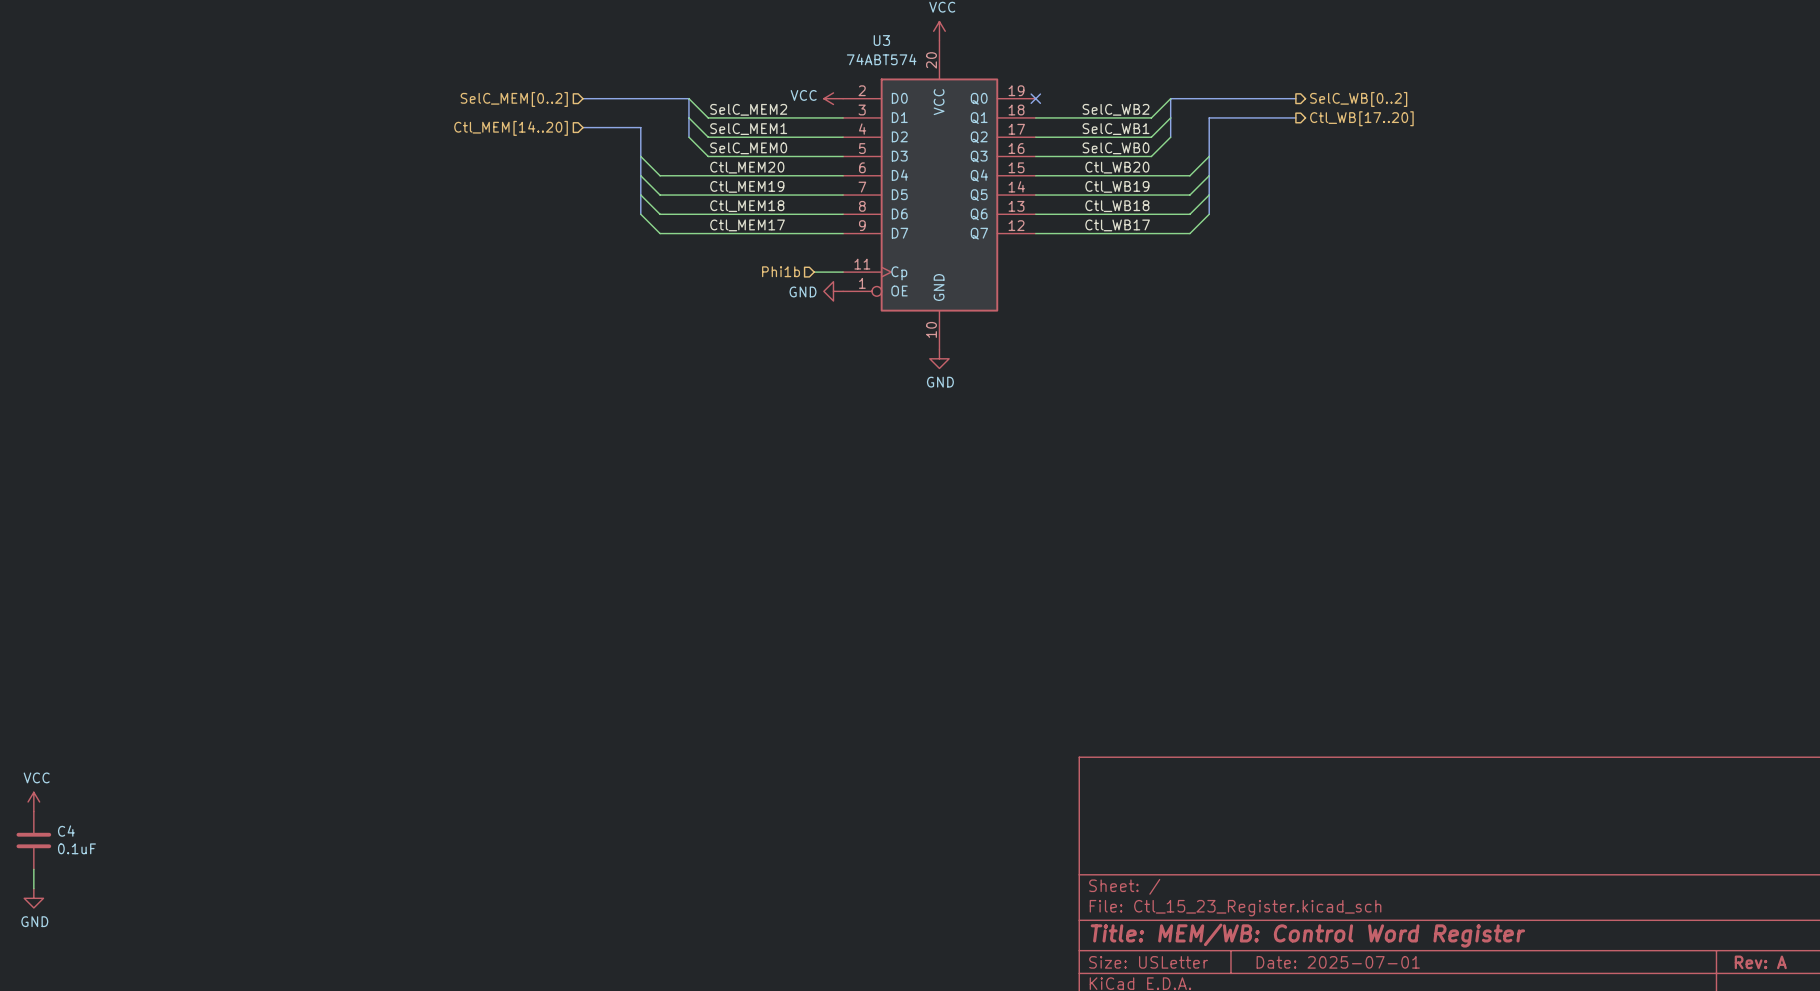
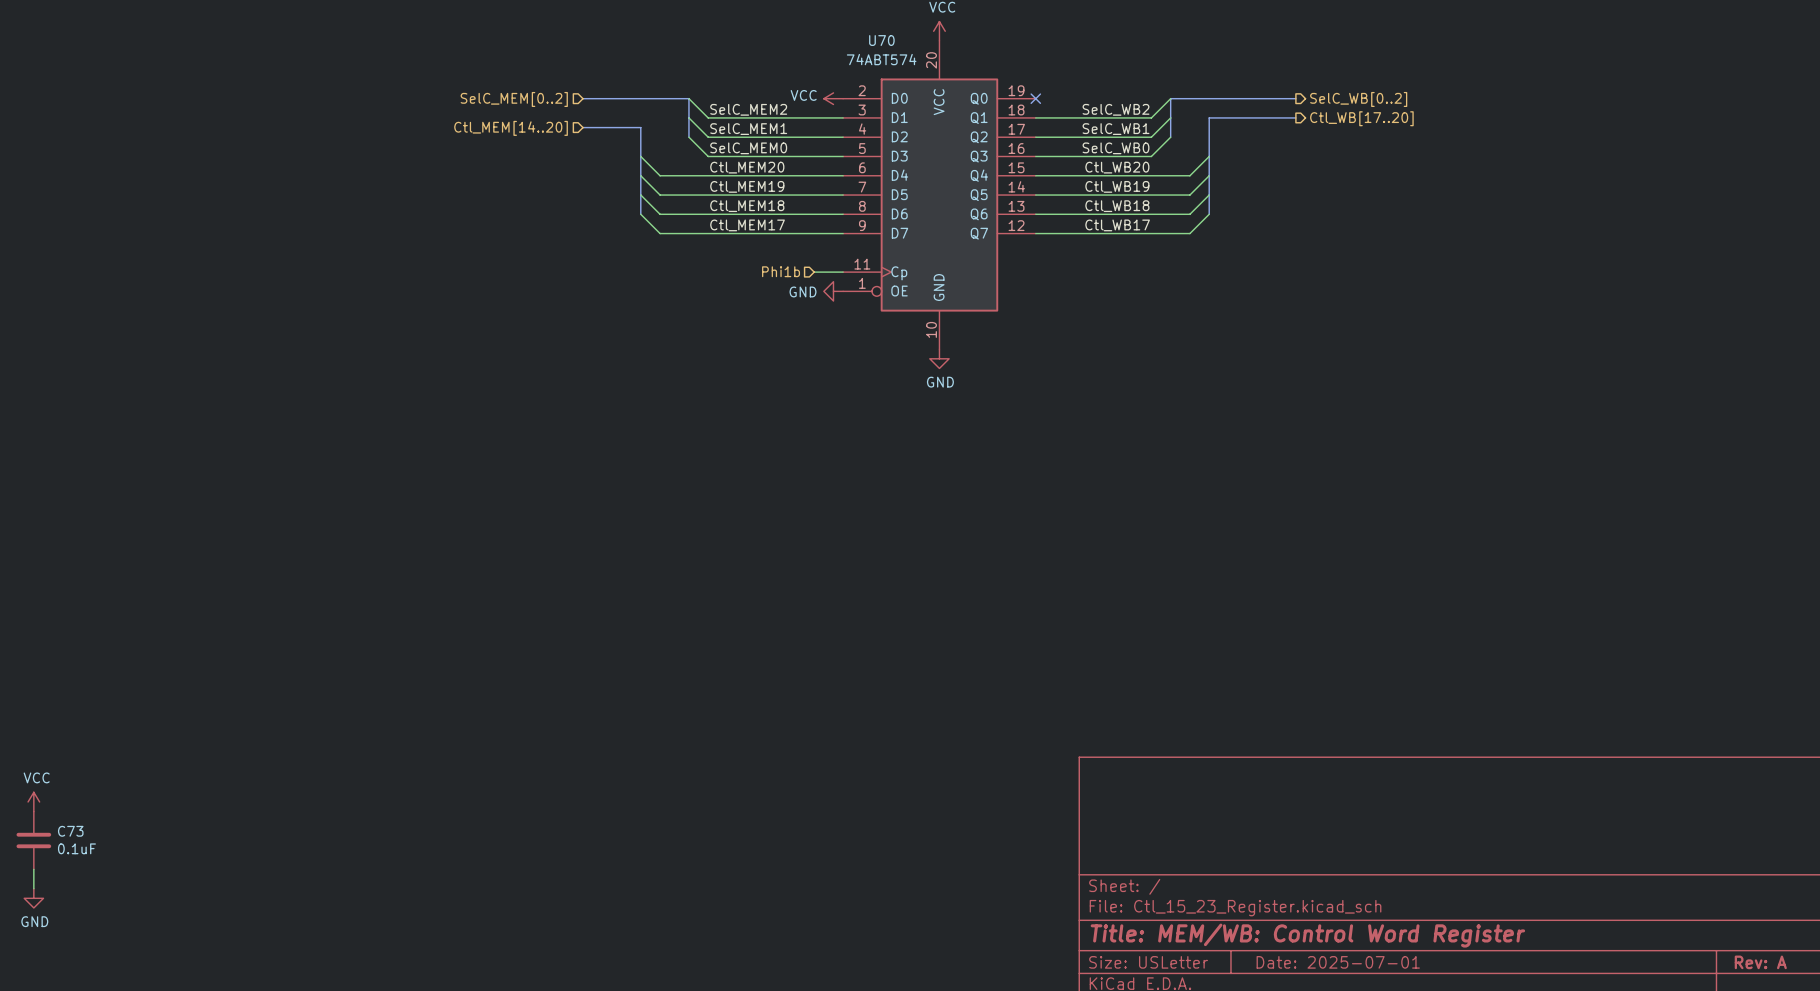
U3 name: U3 (881, 40) -> U70 (881, 40)
C4 name: C4 (66, 831) -> C73 (70, 831)

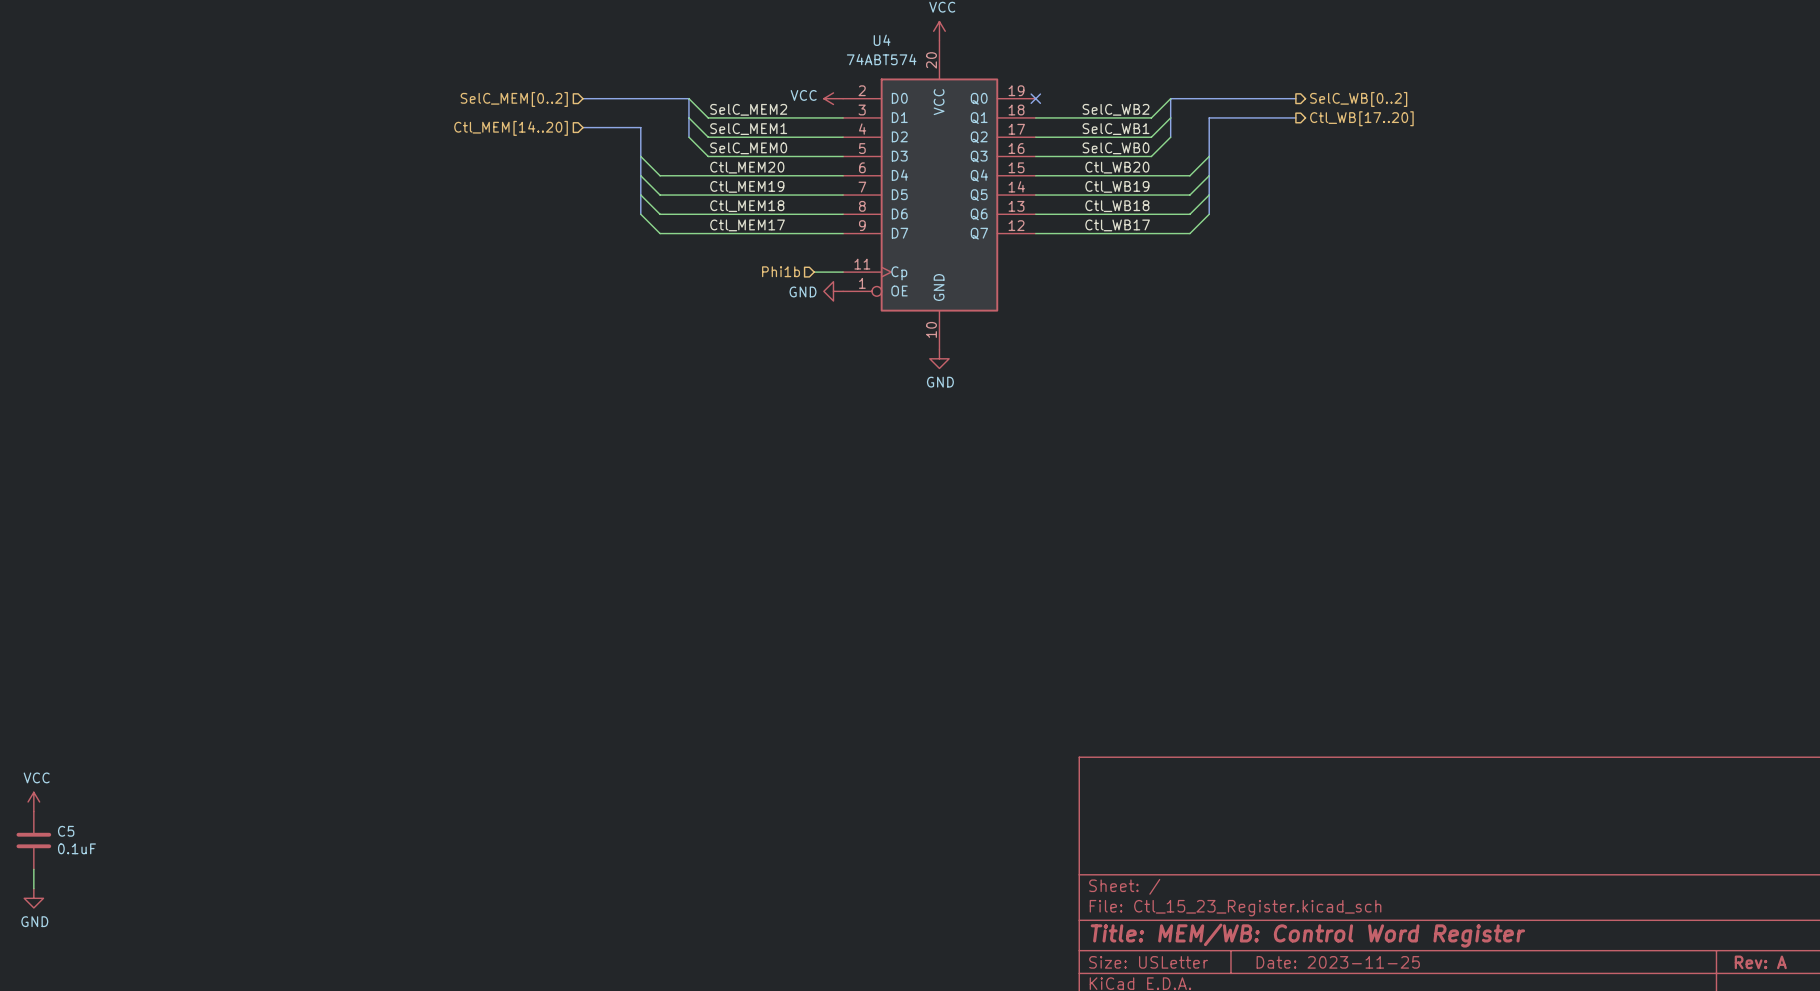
U70 name: U70 (881, 40) -> U4 (882, 40)
C73 name: C73 (70, 831) -> C5 (66, 831)
title block: Date: 2025-07-01 (1338, 962) -> Date: 2023-11-25 (1338, 962)

